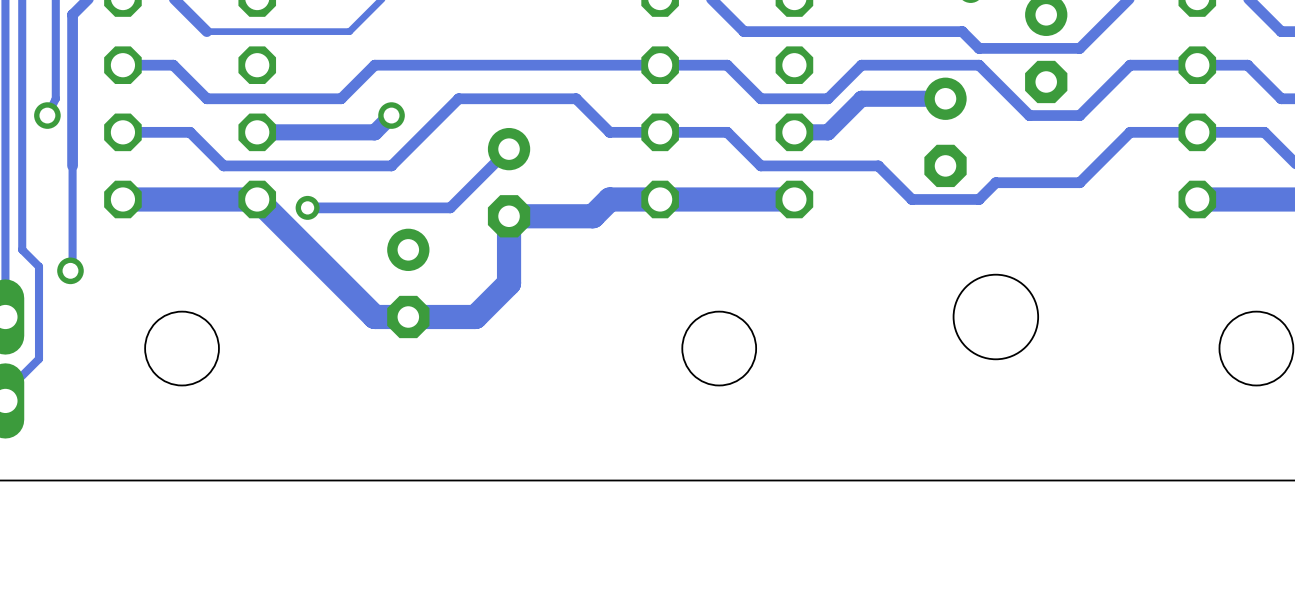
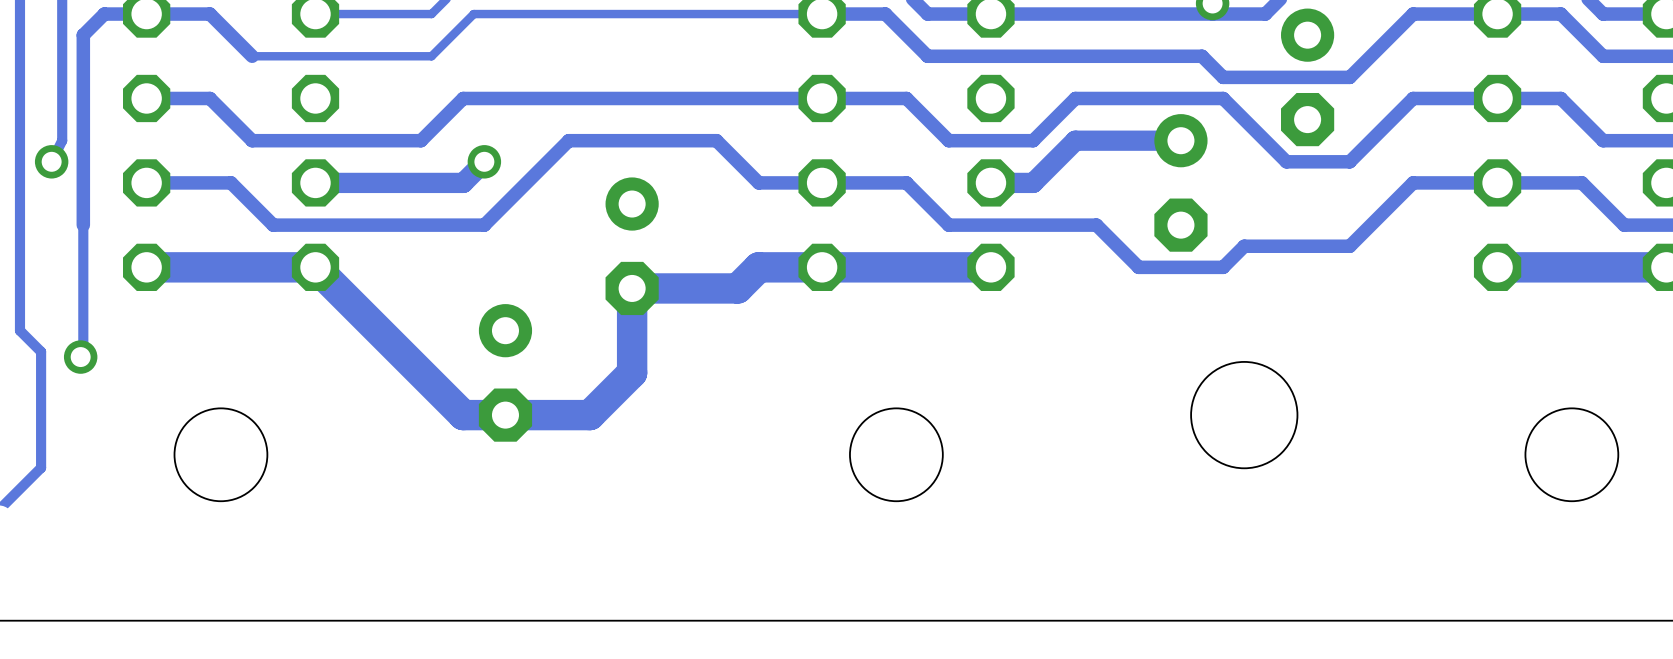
track: (509, 149) (450, 207) (307, 207) -> none
via: (307, 207) -> none

